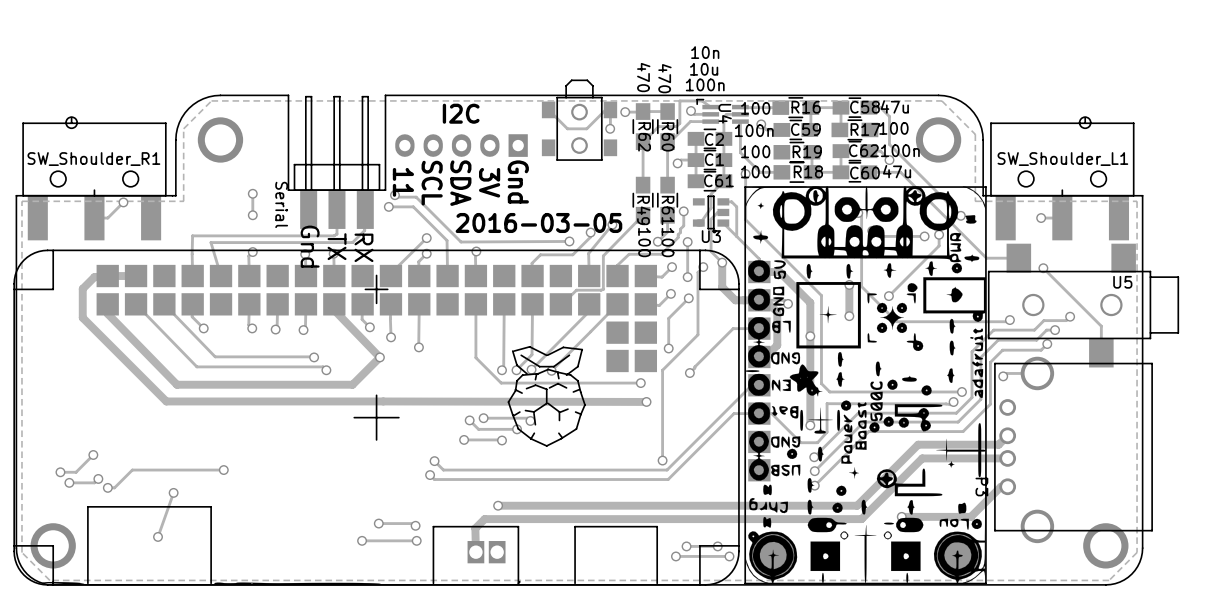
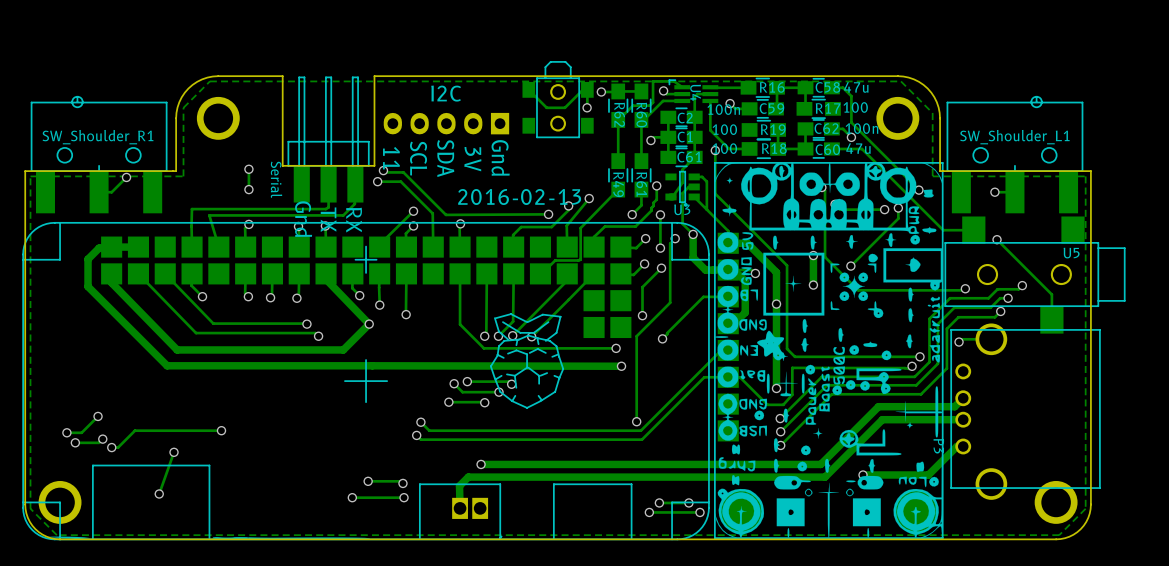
C2 value: 10n (705, 52) -> none
C1 value: 10u (704, 69) -> none
R62 value: 470 (643, 77) -> none
R60 value: 470 (664, 78) -> none
C61 value: 100n (705, 84) -> none
R16 value: 100 (755, 108) -> none
text: 2016-03-05 (538, 222) -> 2016-02-13 (519, 196)
R49 value: 100 (644, 242) -> none
R61 value: 100 (668, 242) -> none

